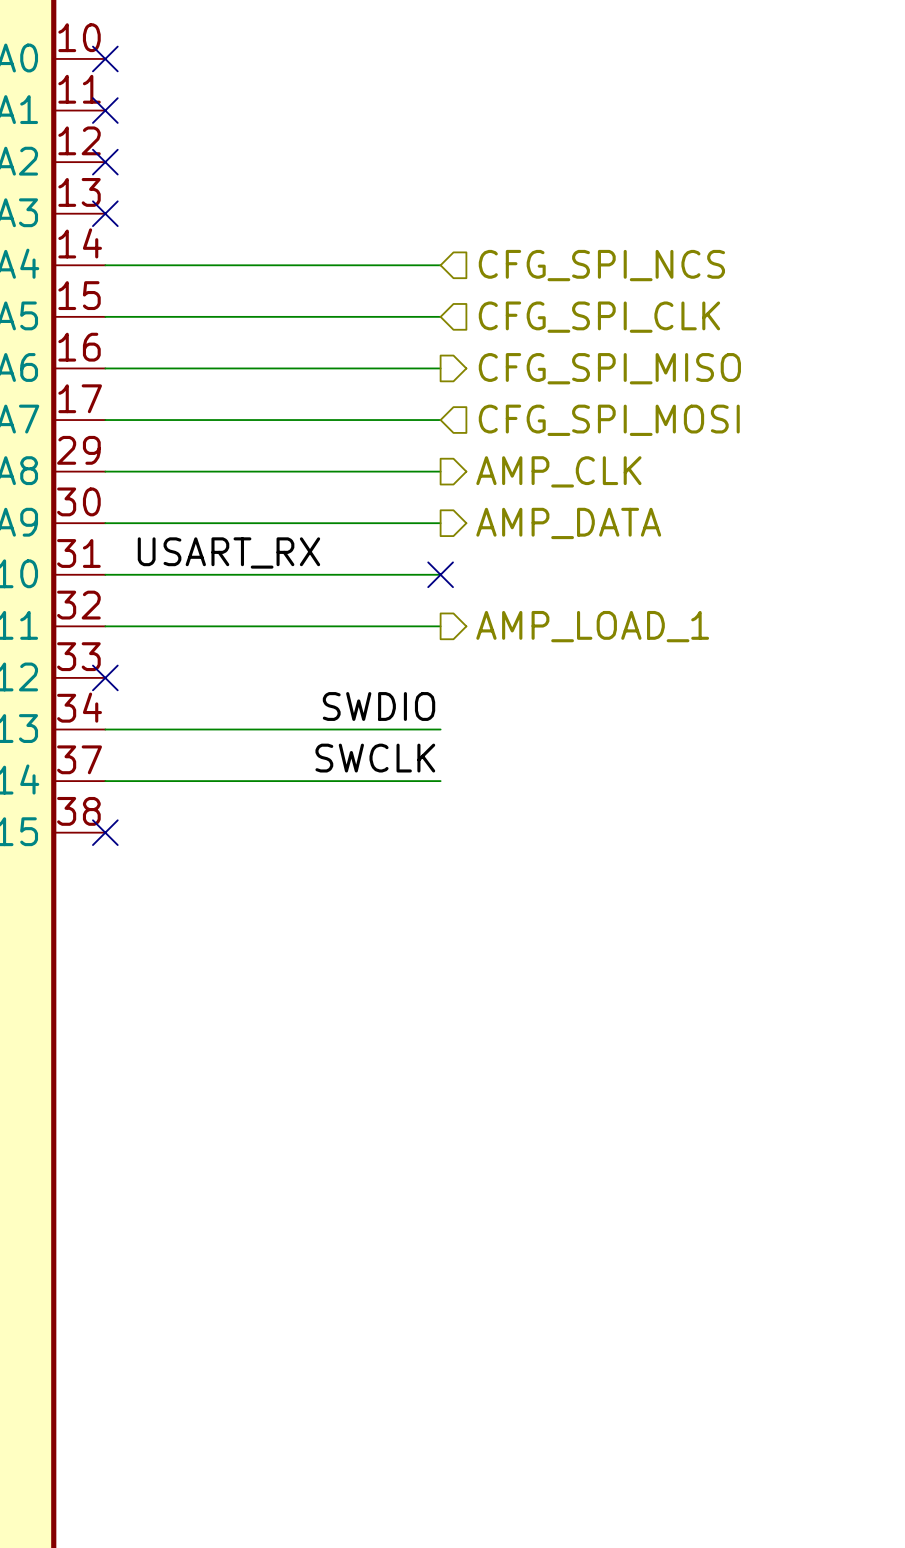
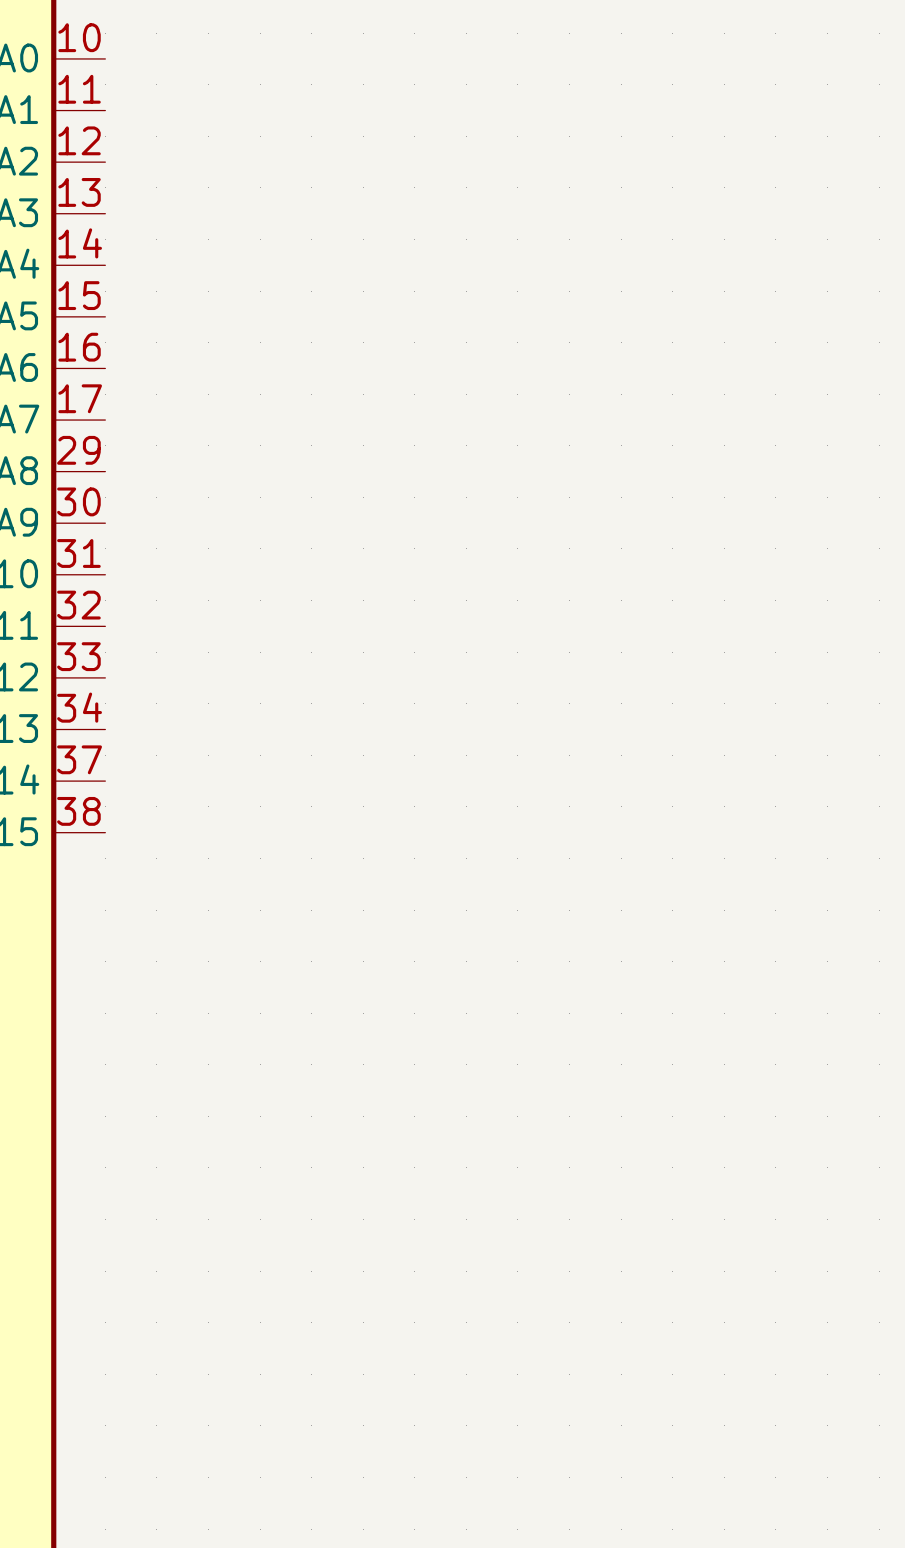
no-connect mark: (105, 58) -> none
no-connect mark: (105, 110) -> none
no-connect mark: (105, 162) -> none
no-connect mark: (105, 213) -> none
wire: (105, 265) (440, 265) -> none
hierarchical label: CFG_SPI_NCS (601, 265) -> none
wire: (105, 316) (440, 316) -> none
hierarchical label: CFG_SPI_CLK (599, 317) -> none
wire: (105, 368) (440, 368) -> none
hierarchical label: CFG_SPI_MISO (609, 368) -> none
wire: (105, 420) (440, 420) -> none
hierarchical label: CFG_SPI_MOSI (609, 420) -> none
wire: (105, 471) (440, 471) -> none
hierarchical label: AMP_CLK (558, 471) -> none
wire: (105, 523) (440, 523) -> none
hierarchical label: AMP_DATA (568, 523) -> none
label: USART_RX (228, 552) -> none
wire: (105, 574) (440, 574) -> none
no-connect mark: (440, 574) -> none
wire: (105, 626) (440, 626) -> none
hierarchical label: AMP_LOAD_1 (592, 626) -> none
no-connect mark: (105, 677) -> none
label: SWDIO (379, 706) -> none
wire: (105, 729) (440, 729) -> none
label: SWCLK (375, 758) -> none
wire: (105, 781) (440, 781) -> none
no-connect mark: (105, 832) -> none

